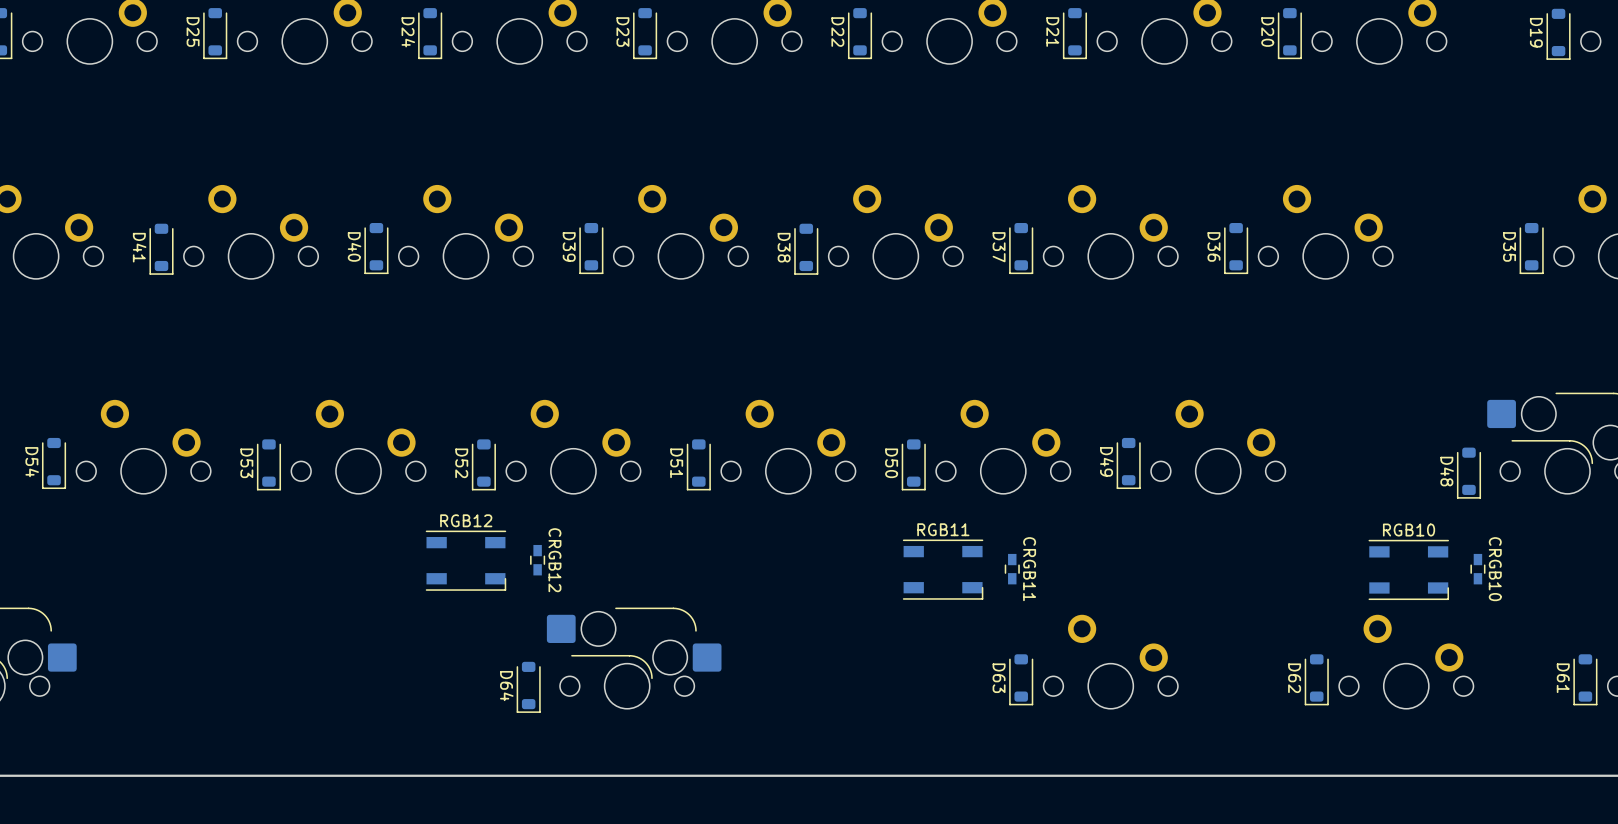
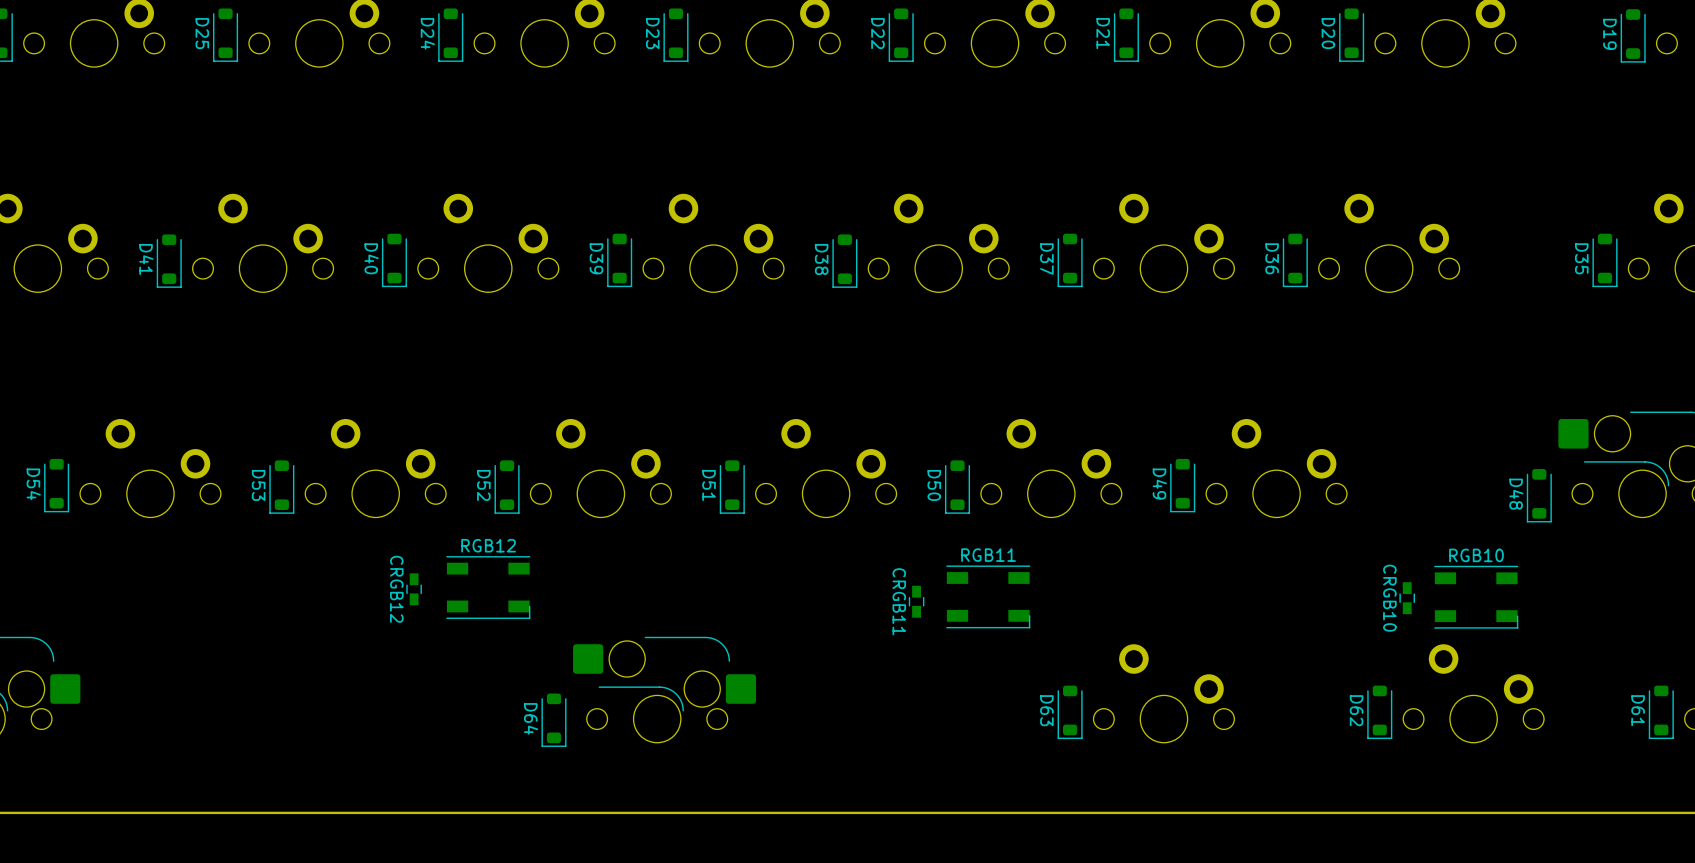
CRGB12 position: (537, 560) -> (414, 589)
CRGB12 name position: CRGB12 (554, 560) -> CRGB12 (396, 589)
CRGB11 position: (1012, 569) -> (916, 601)
CRGB11 name position: CRGB11 (1029, 569) -> CRGB11 (899, 601)
CRGB10 position: (1477, 569) -> (1407, 598)
CRGB10 name position: CRGB10 (1495, 569) -> CRGB10 (1389, 598)

